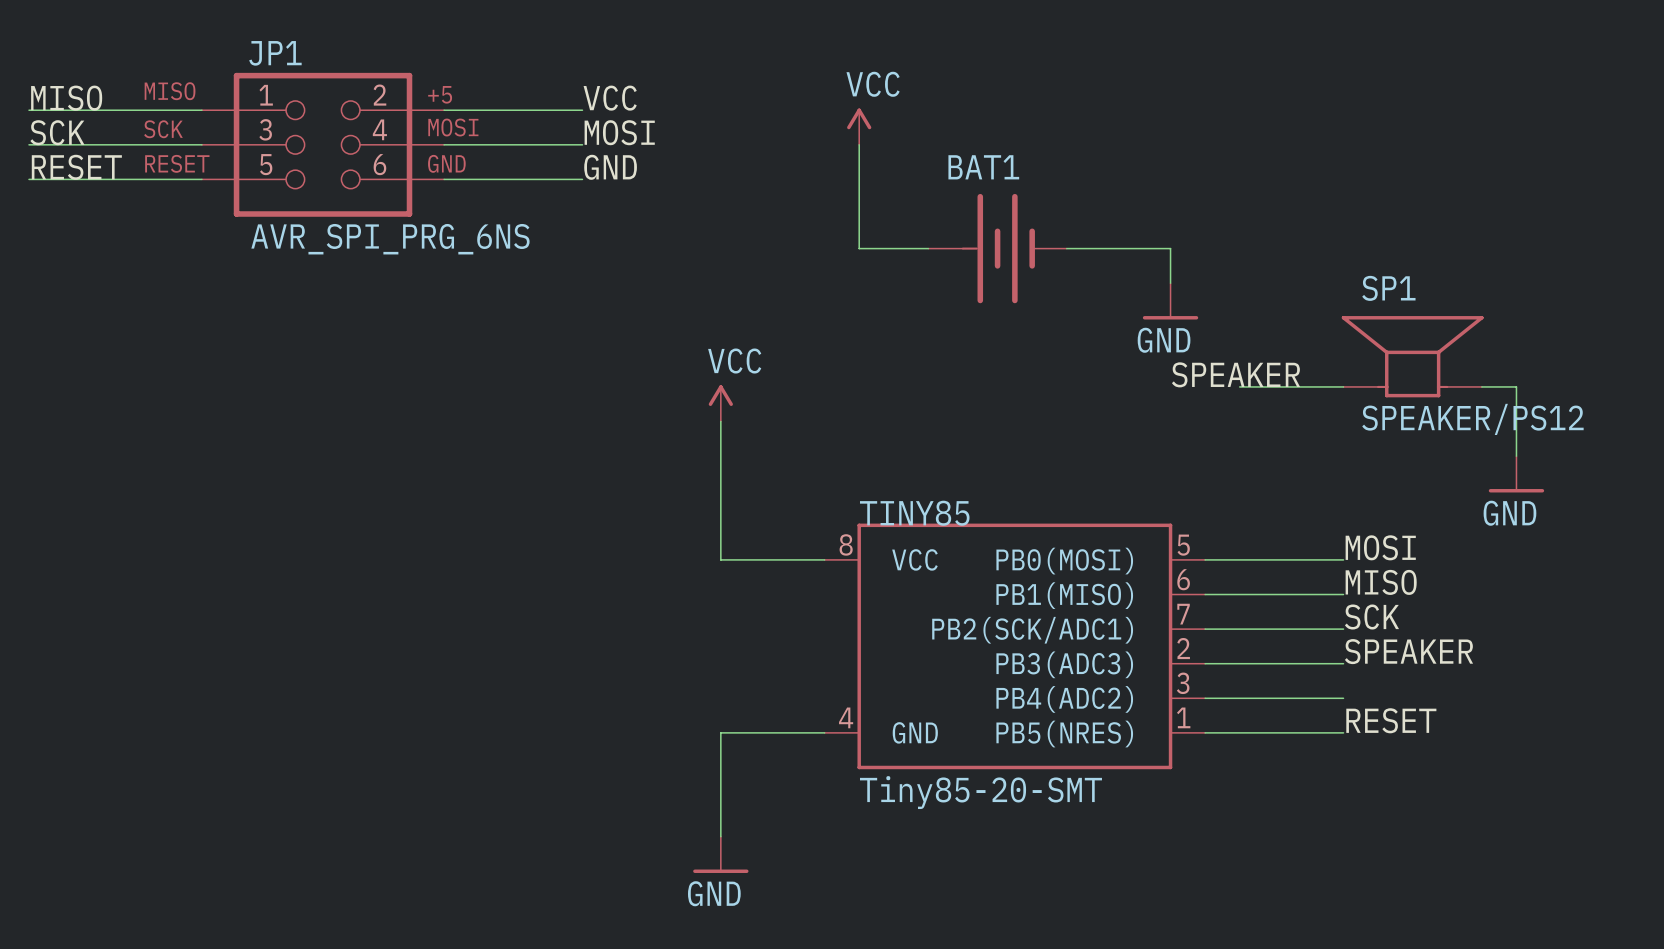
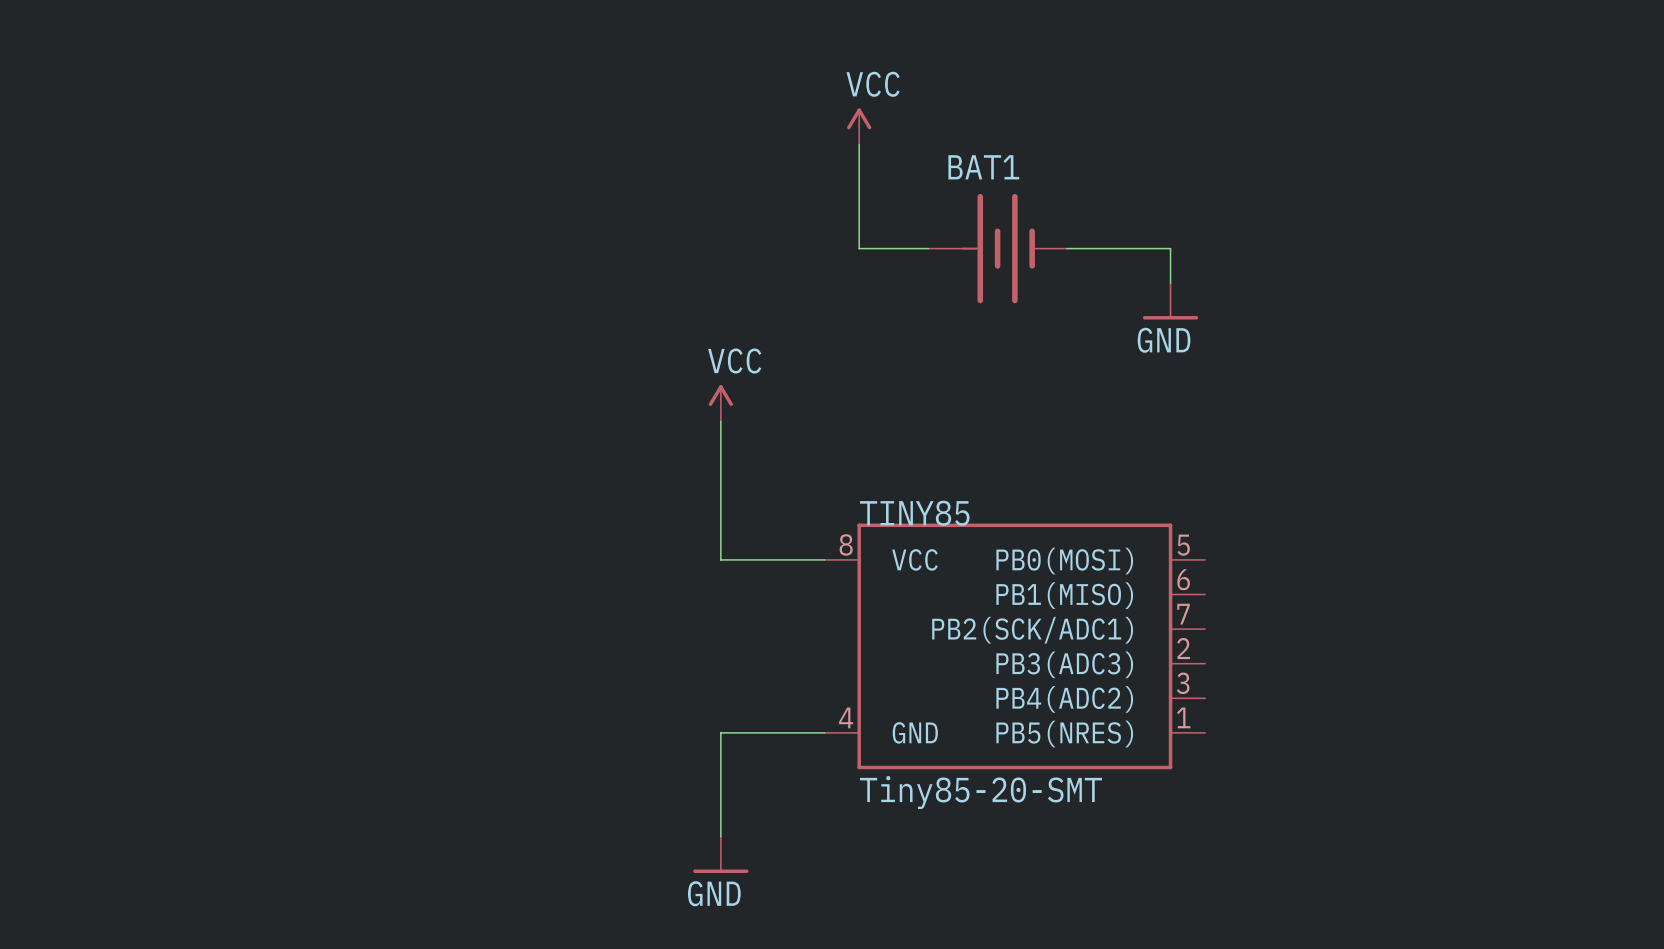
label: MISO (66, 98) -> none
label: VCC (610, 98) -> none
wire: (28, 110) (201, 110) -> none
wire: (444, 110) (582, 110) -> none
label: SCK (57, 132) -> none
label: MOSI (619, 132) -> none
wire: (28, 144) (201, 144) -> none
JP1: AVR_SPI_PRG_6NS (323, 144) -> none
wire: (444, 144) (582, 144) -> none
label: RESET (76, 167) -> none
label: GND (610, 167) -> none
wire: (28, 179) (201, 179) -> none
wire: (444, 179) (582, 179) -> none
SP1: SPEAKER/PS12 (1412, 356) -> none
label: SPEAKER (1236, 374) -> none
wire: (1239, 386) (1343, 386) -> none
wire: (1481, 386) (1516, 386) (1516, 456) -> none
power symbol: GND (1516, 474) -> none
label: MOSI (1380, 547) -> none
wire: (1205, 559) (1343, 559) -> none
label: MISO (1381, 582) -> none
wire: (1205, 594) (1343, 594) -> none
label: SCK (1371, 617) -> none
wire: (1205, 629) (1343, 629) -> none
label: SPEAKER (1408, 651) -> none
wire: (1205, 663) (1343, 663) -> none
wire: (1205, 698) (1343, 698) -> none
label: RESET (1391, 720) -> none
wire: (1205, 732) (1343, 732) -> none

